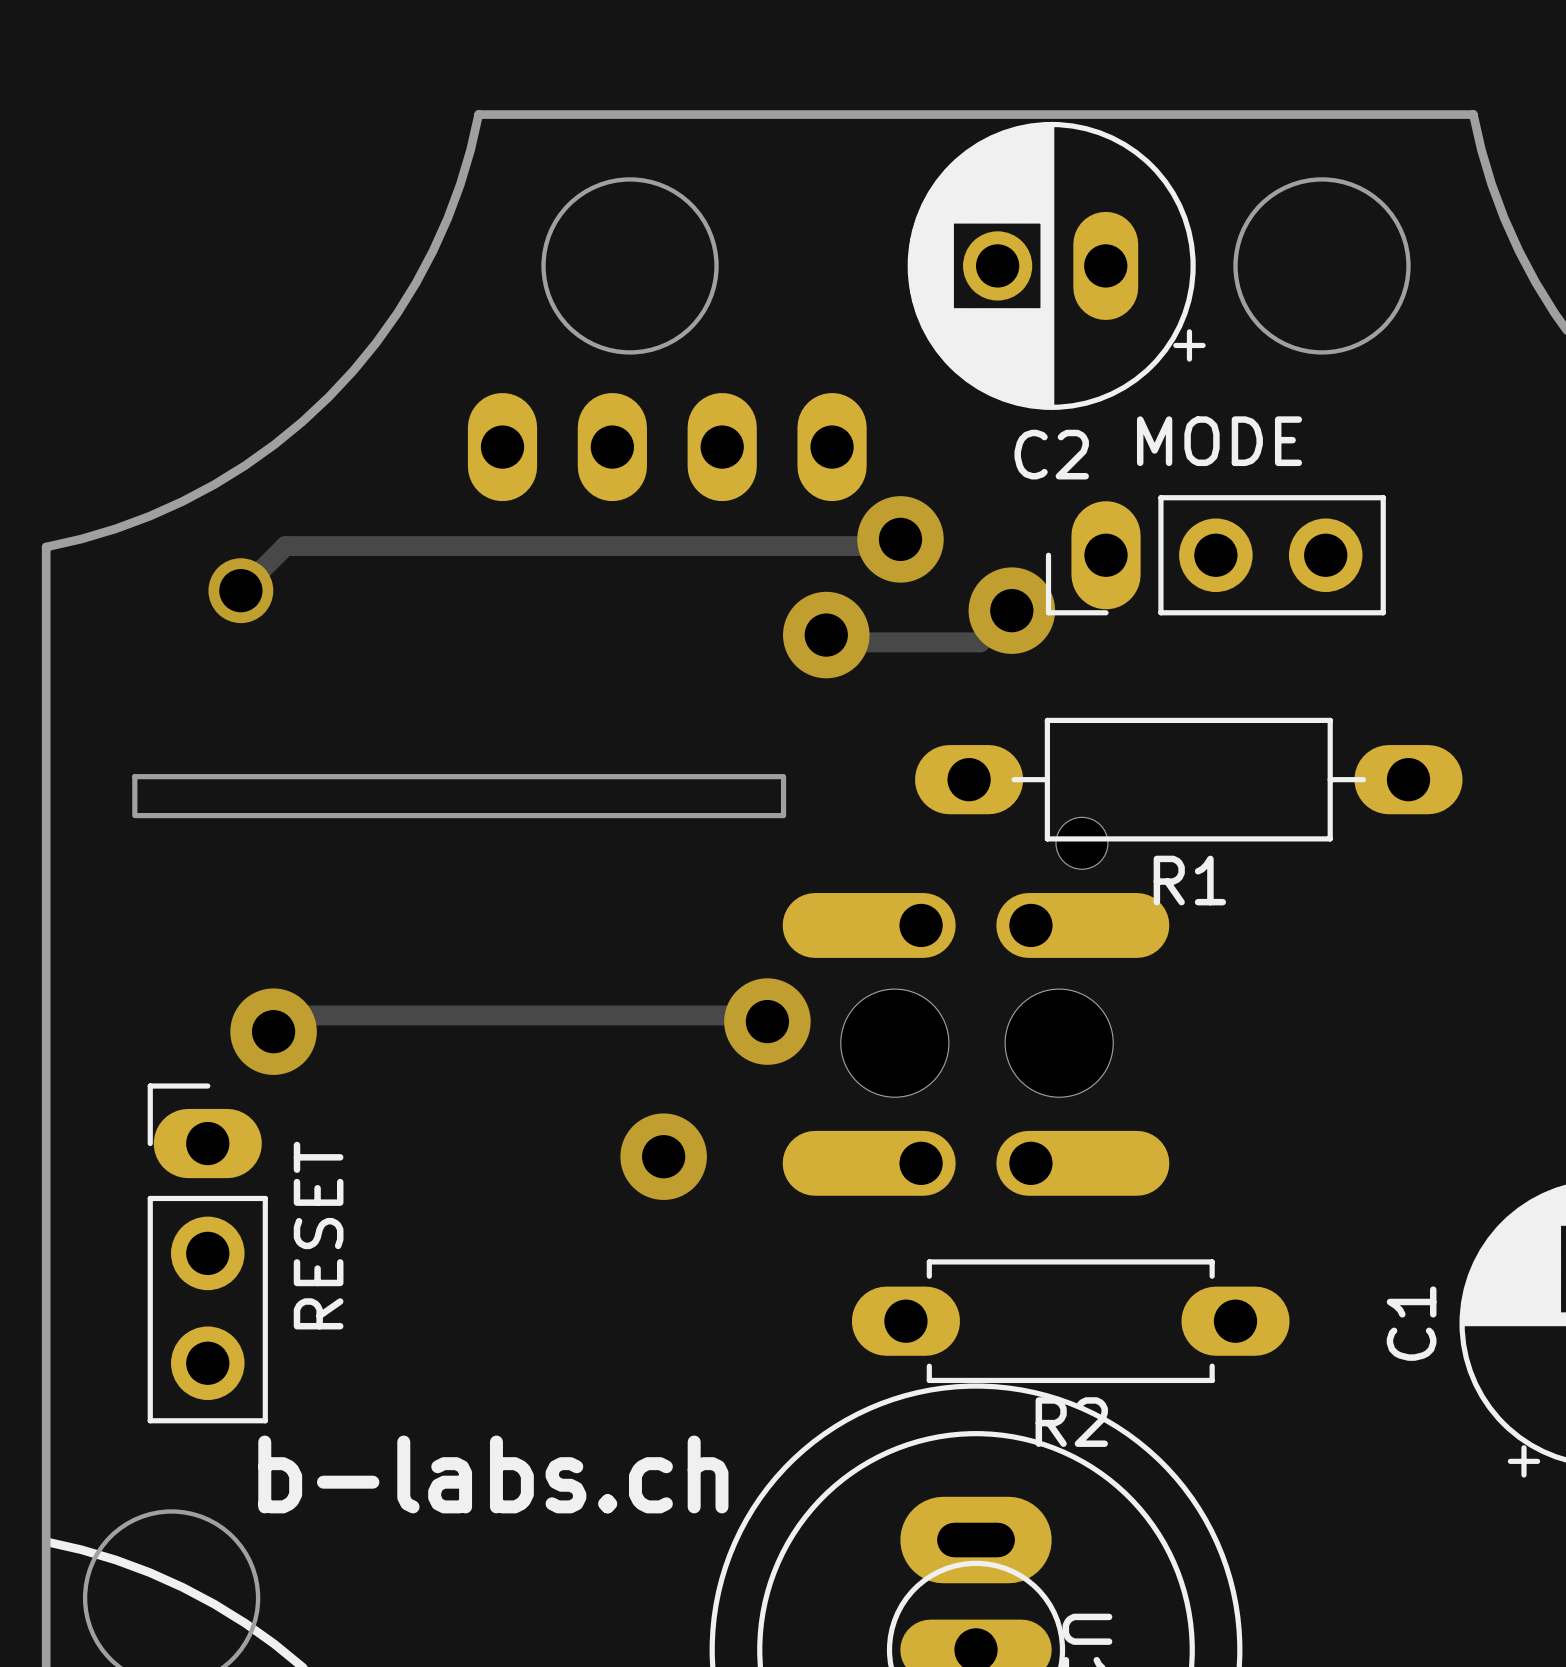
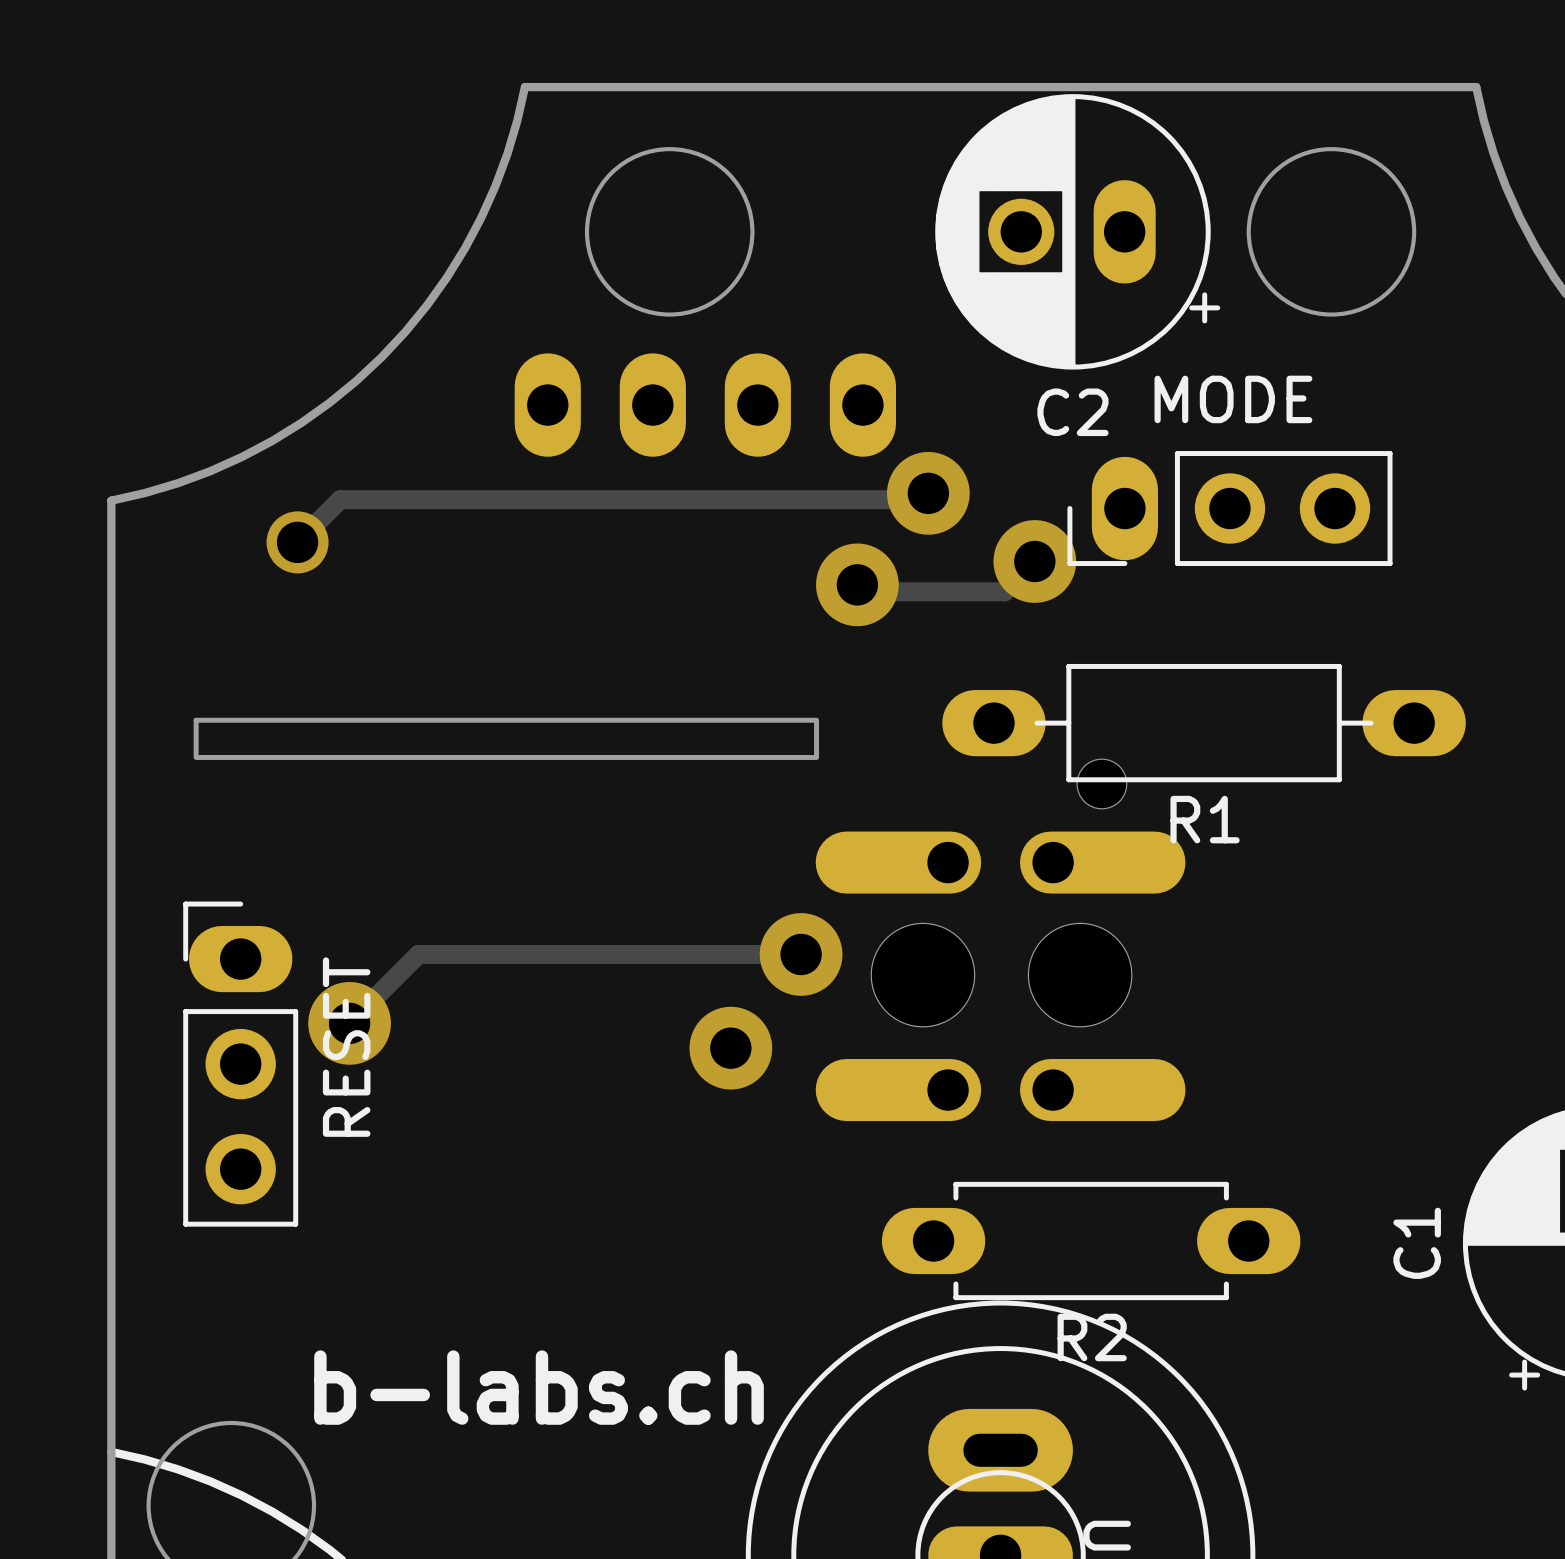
track: (767, 1021) (761, 1015) (289, 1015) (273, 1031) -> (801, 954) (418, 954) (349, 1023)
via position: (273, 1031) -> (349, 1023)
via position: (663, 1156) -> (730, 1048)
part position: (207, 1253) -> (240, 1064)

